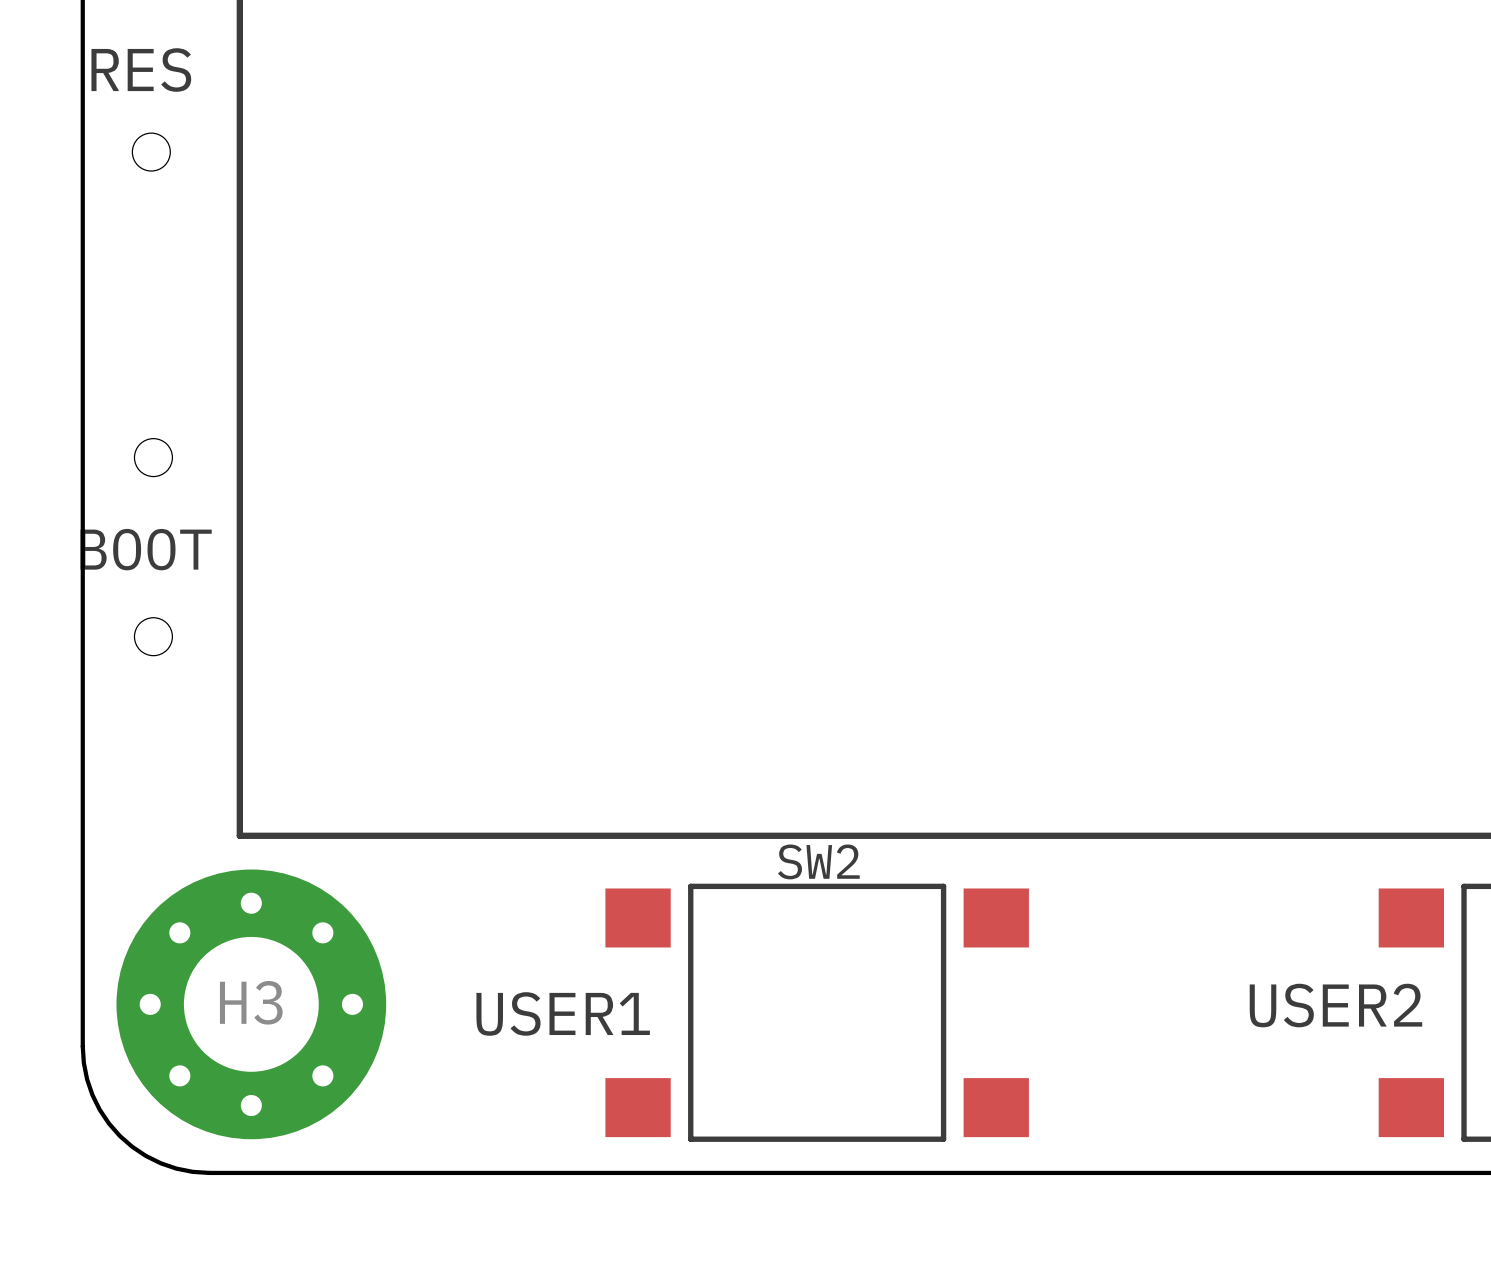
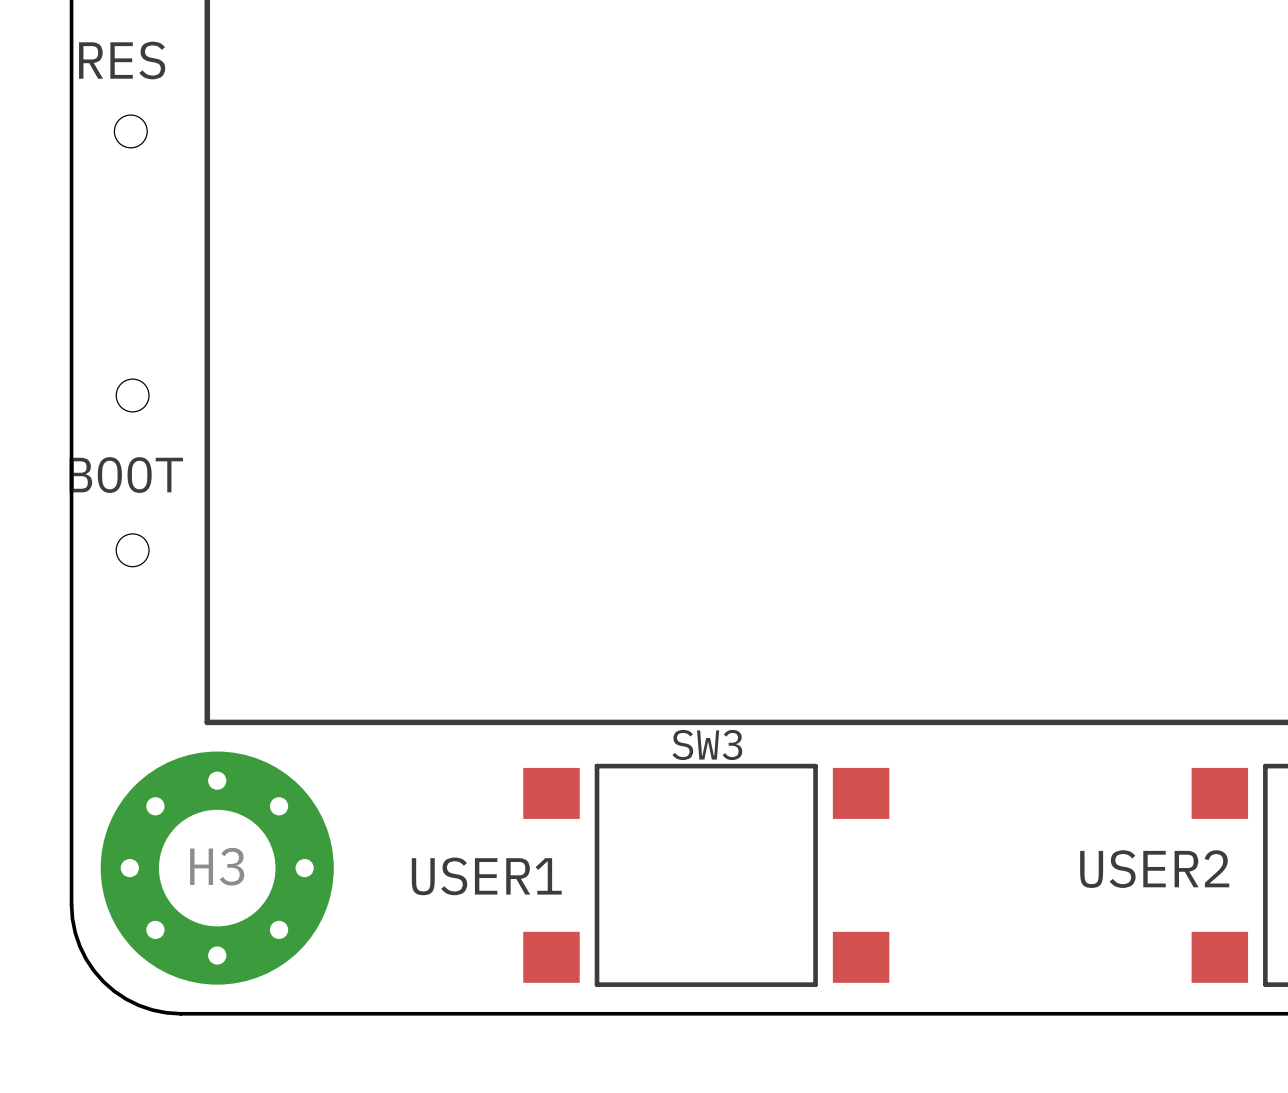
SW2 name: SW2 (818, 861) -> SW3 (707, 744)

